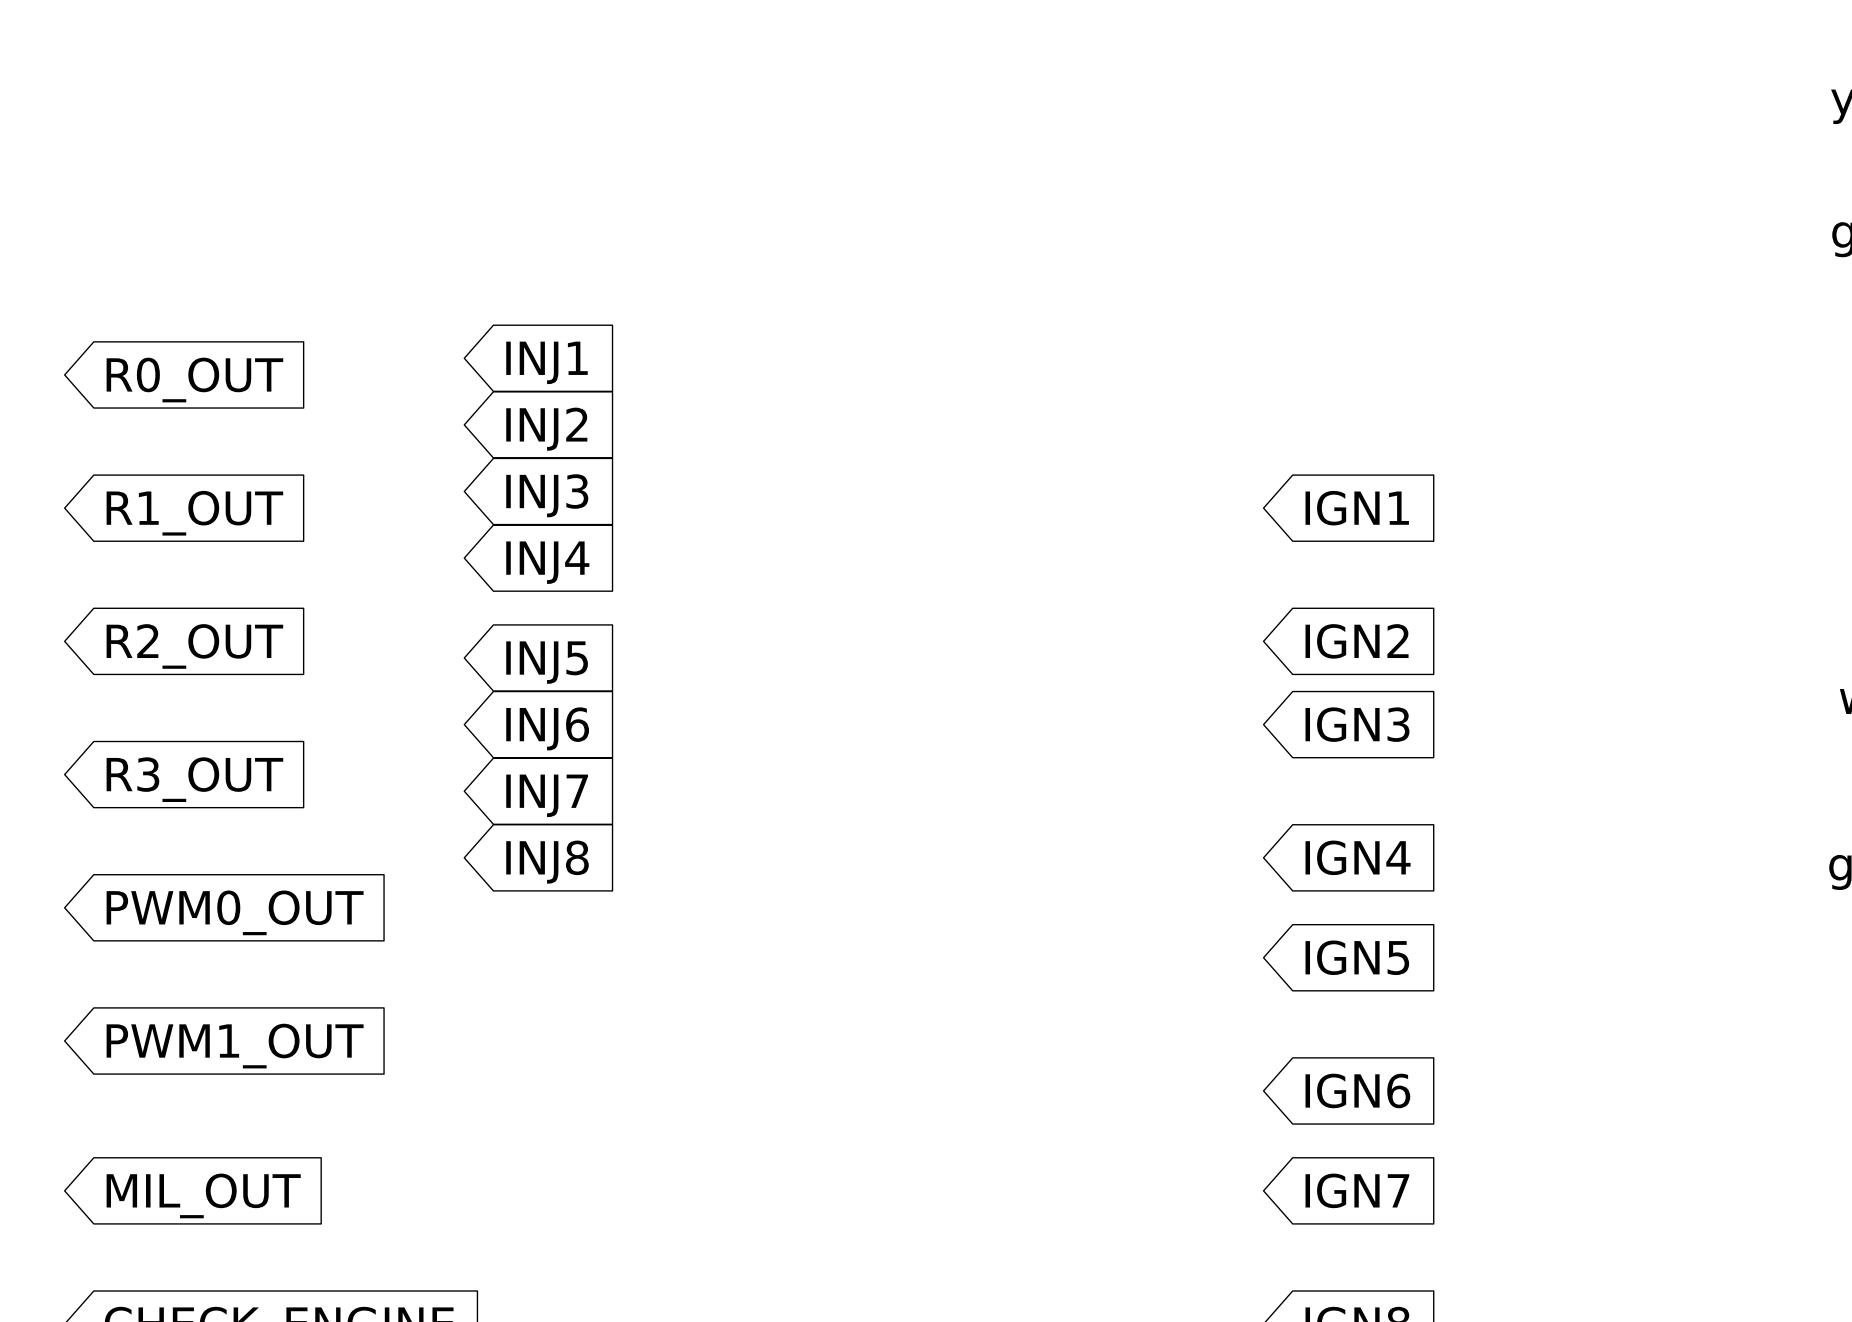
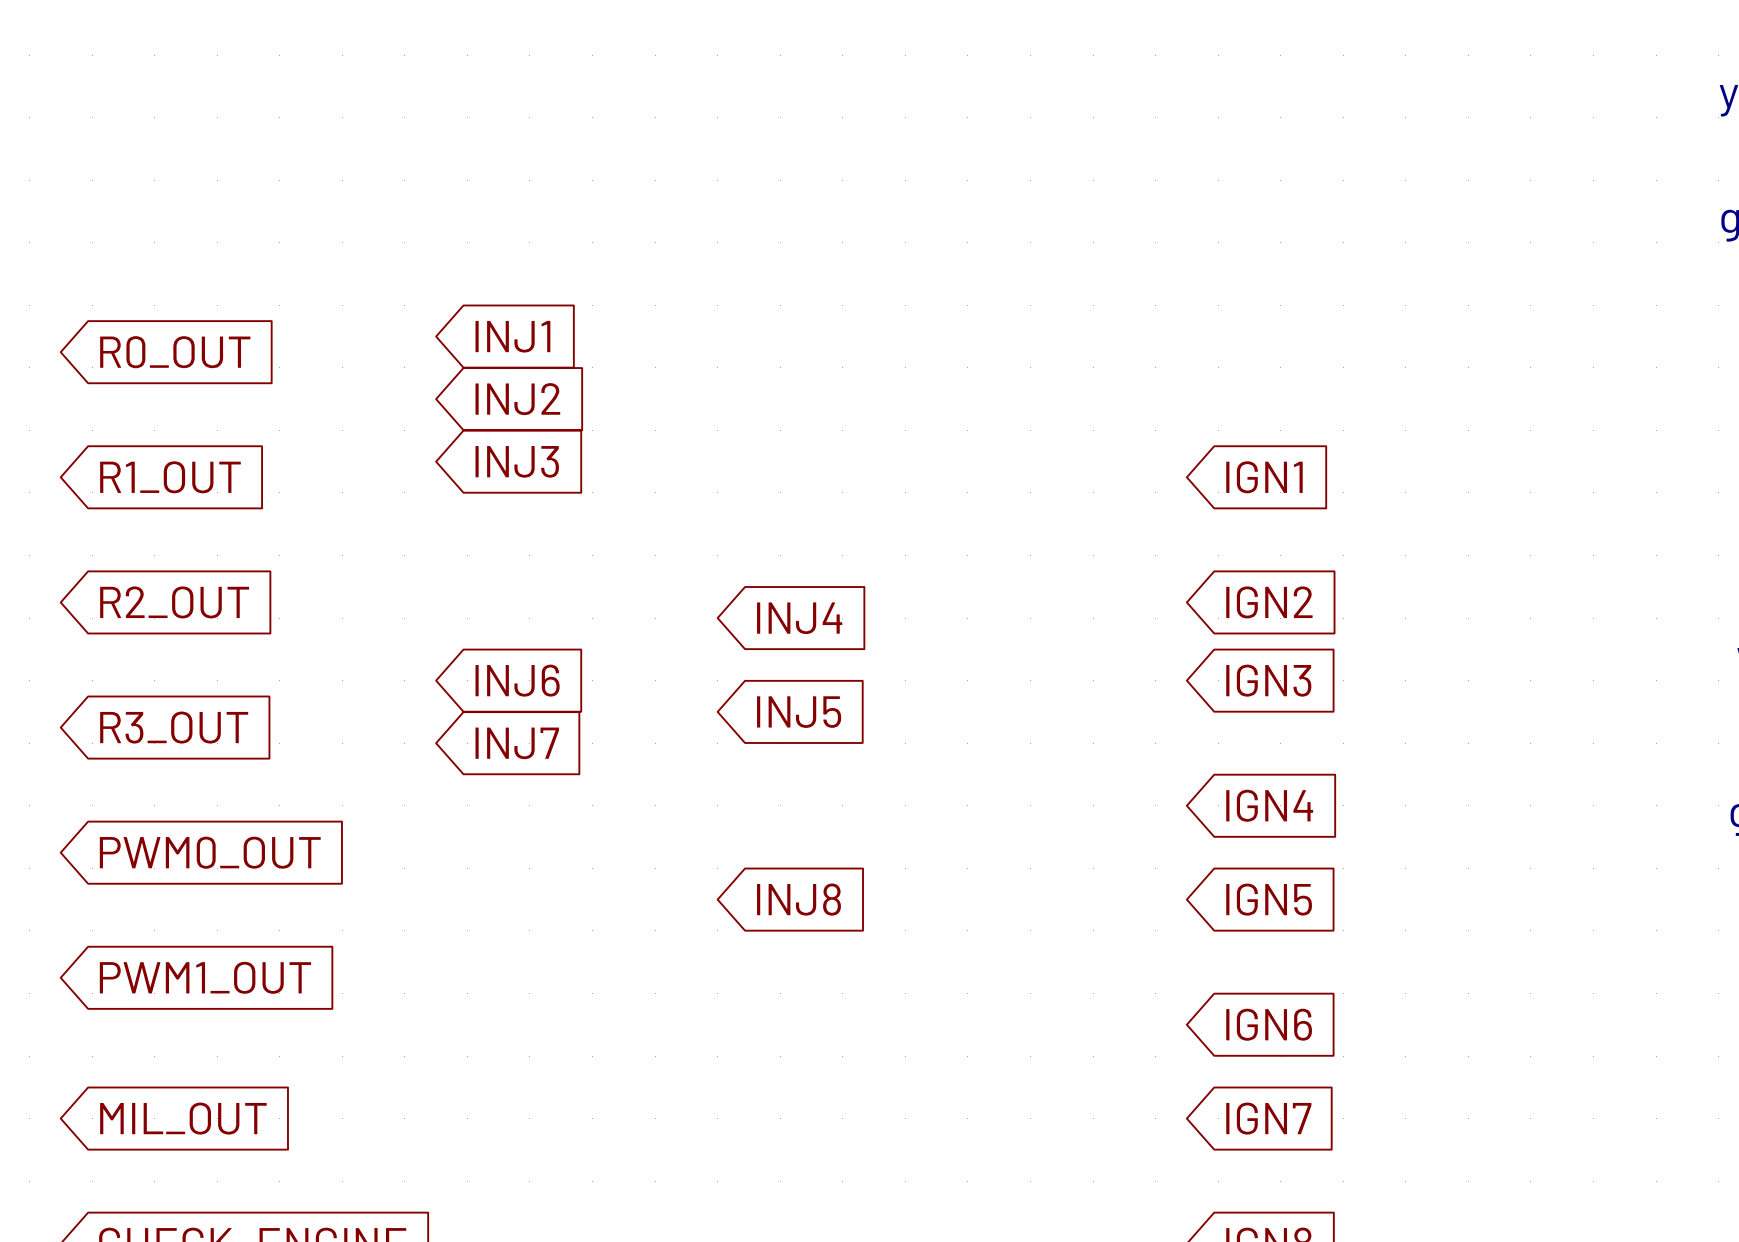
global label position: INJ4 (547, 562) -> INJ4 (799, 618)
global label position: INJ5 (547, 662) -> INJ5 (799, 712)
global label position: INJ8 (547, 862) -> INJ8 (799, 899)

